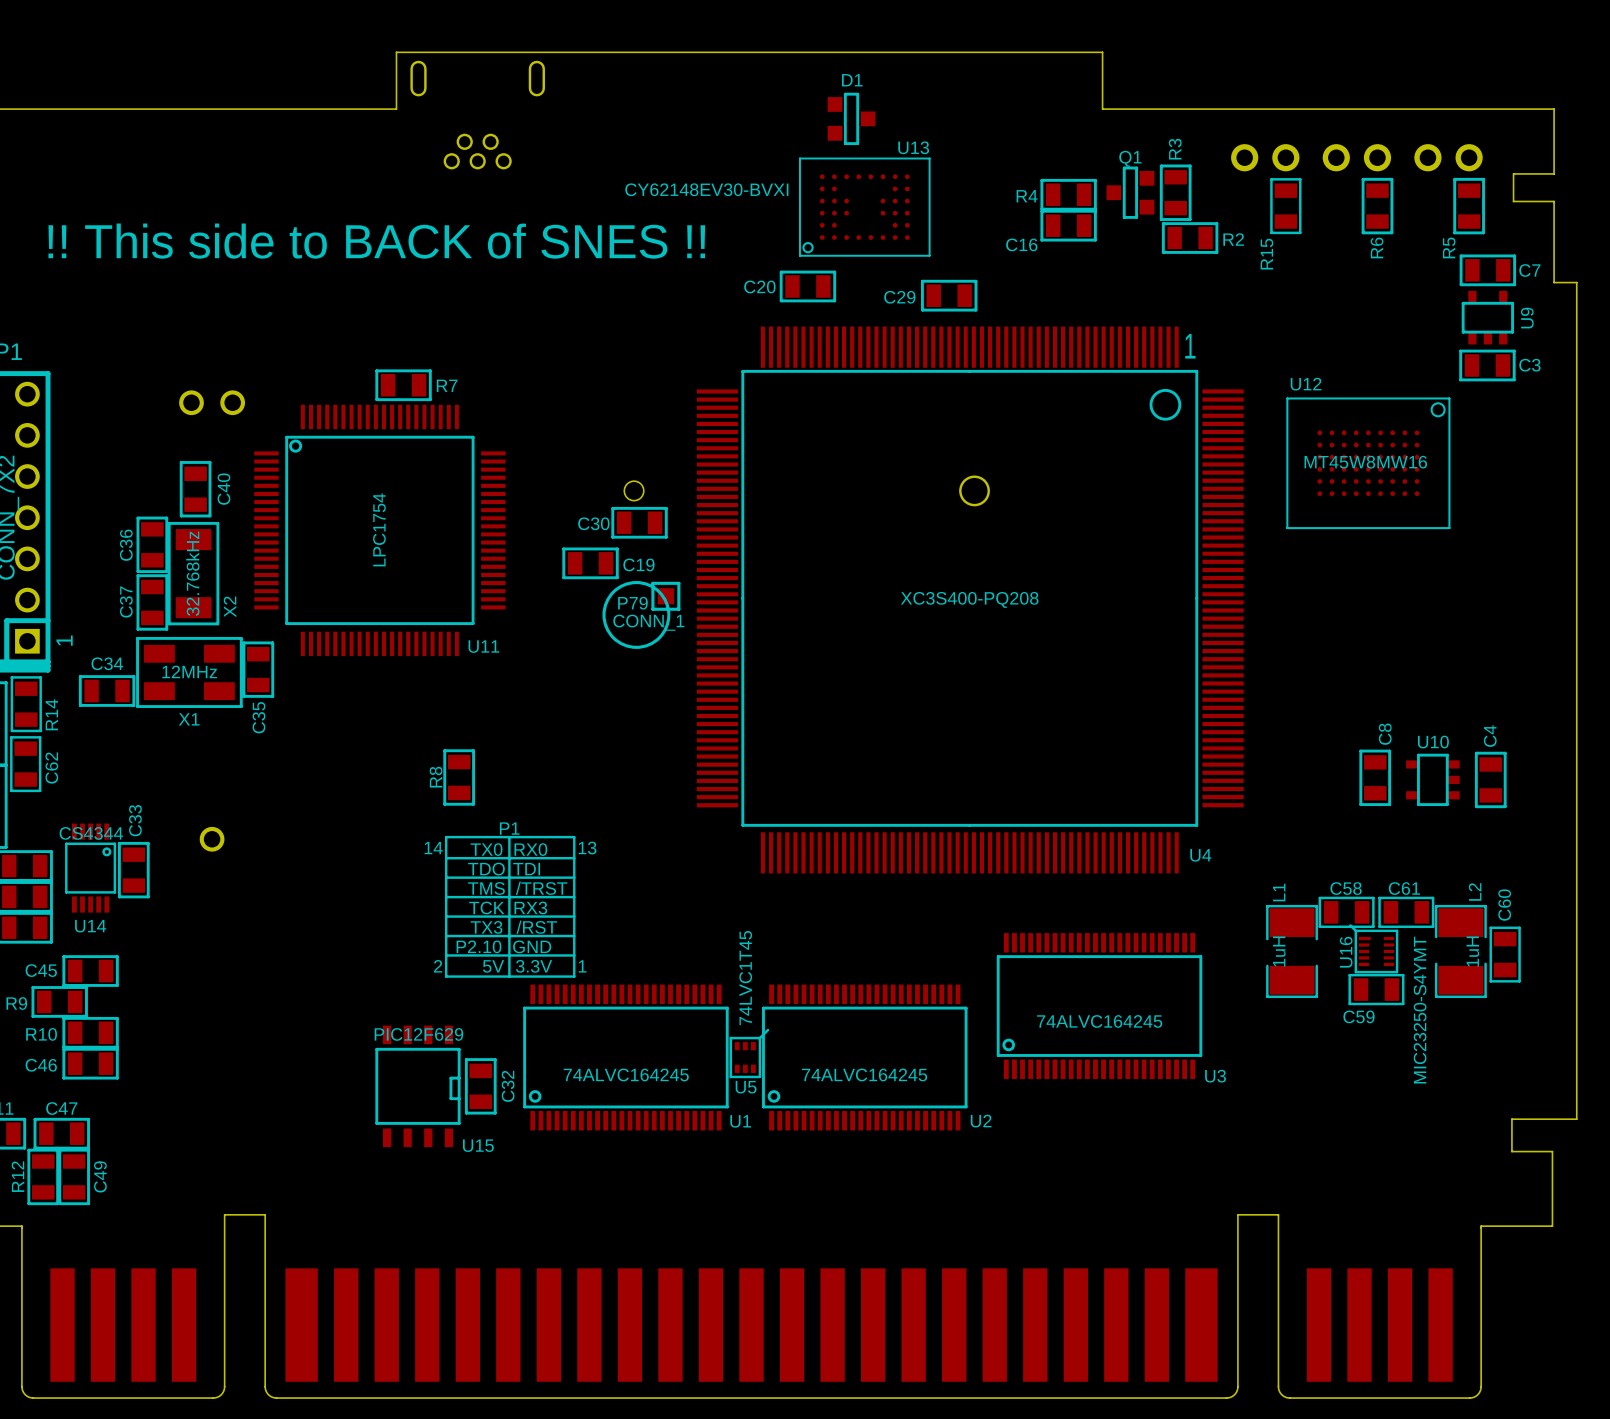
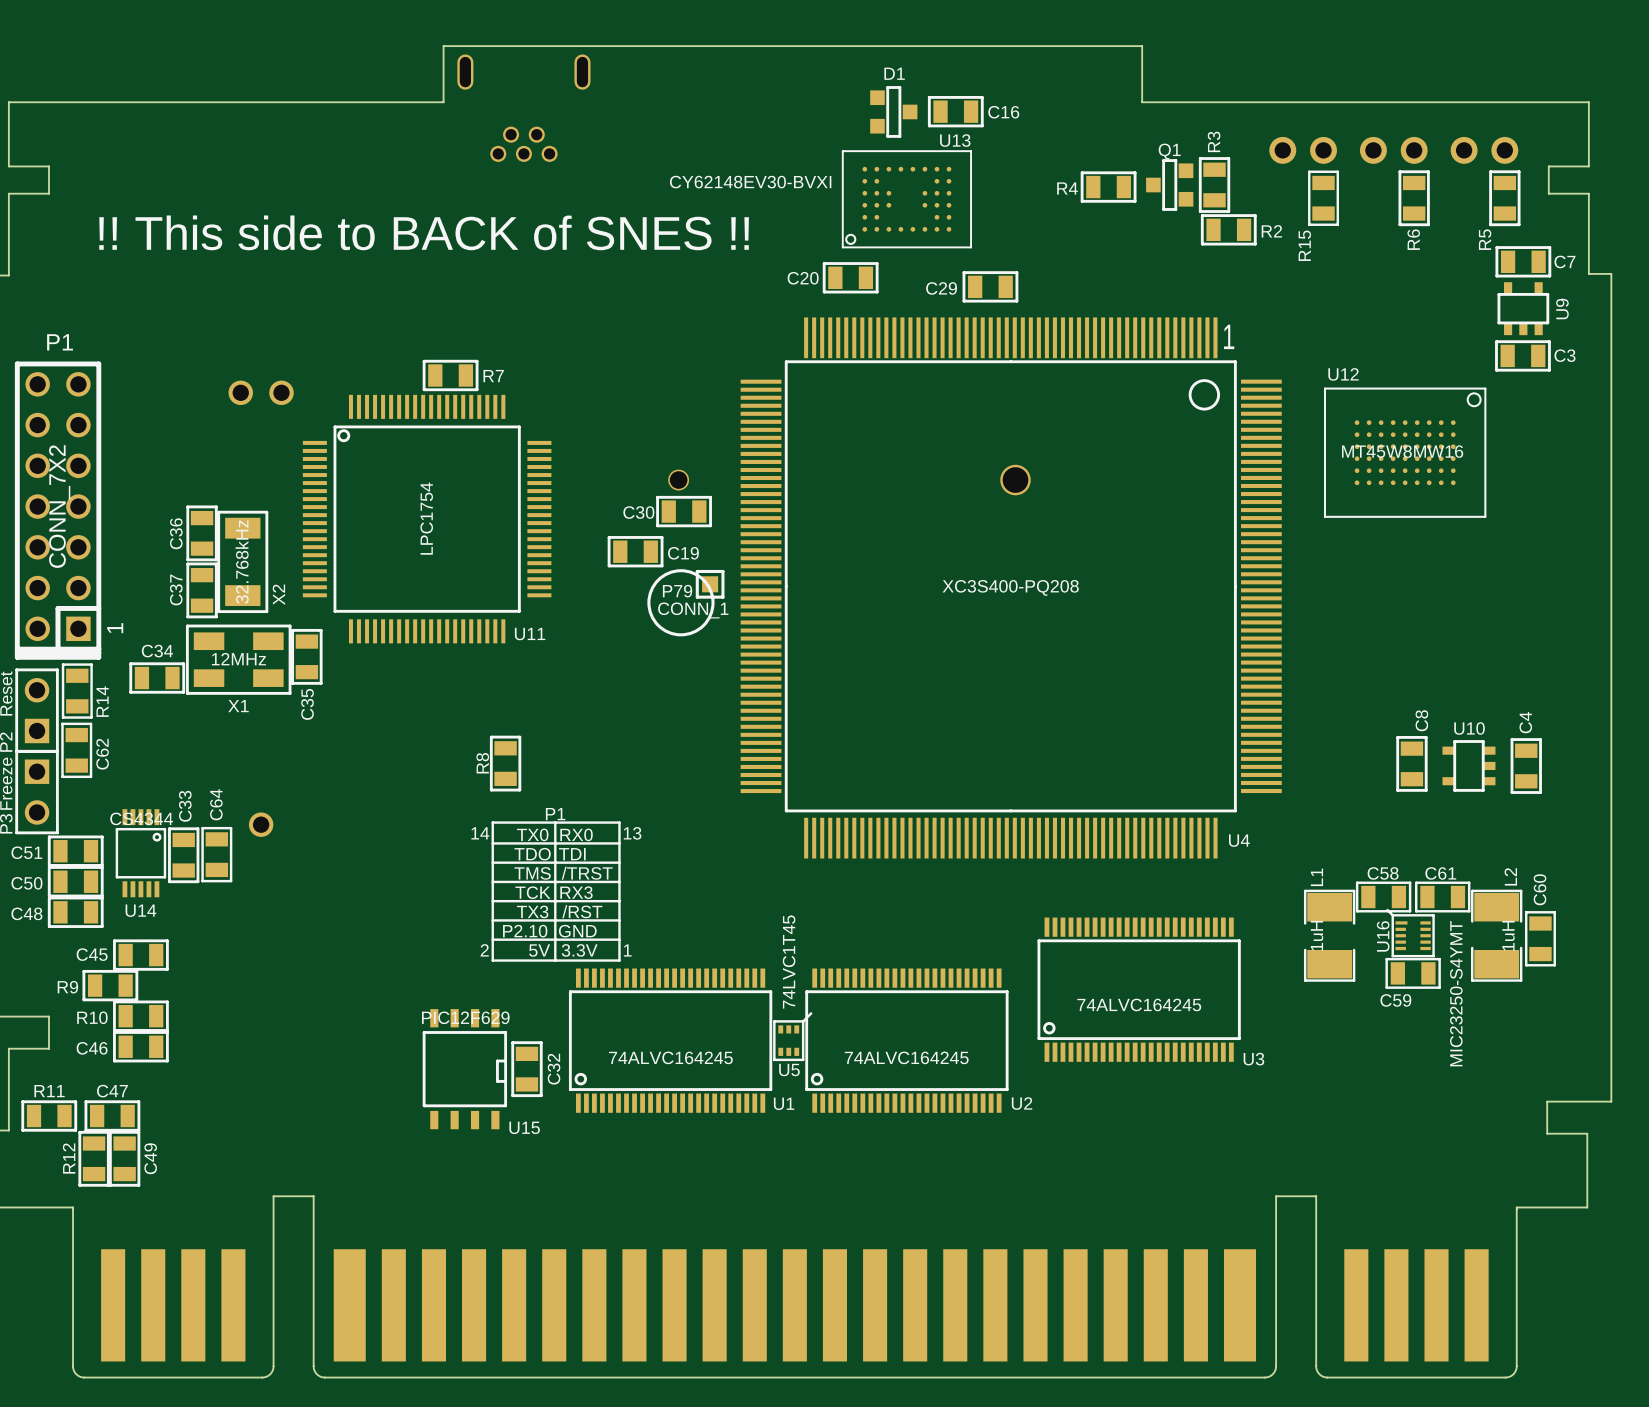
C16 position: (1068, 225) -> (955, 111)
C16 name position: C16 (1021, 244) -> C16 (1003, 112)
C40: (195, 489) -> none
C64: none -> (216, 854)

